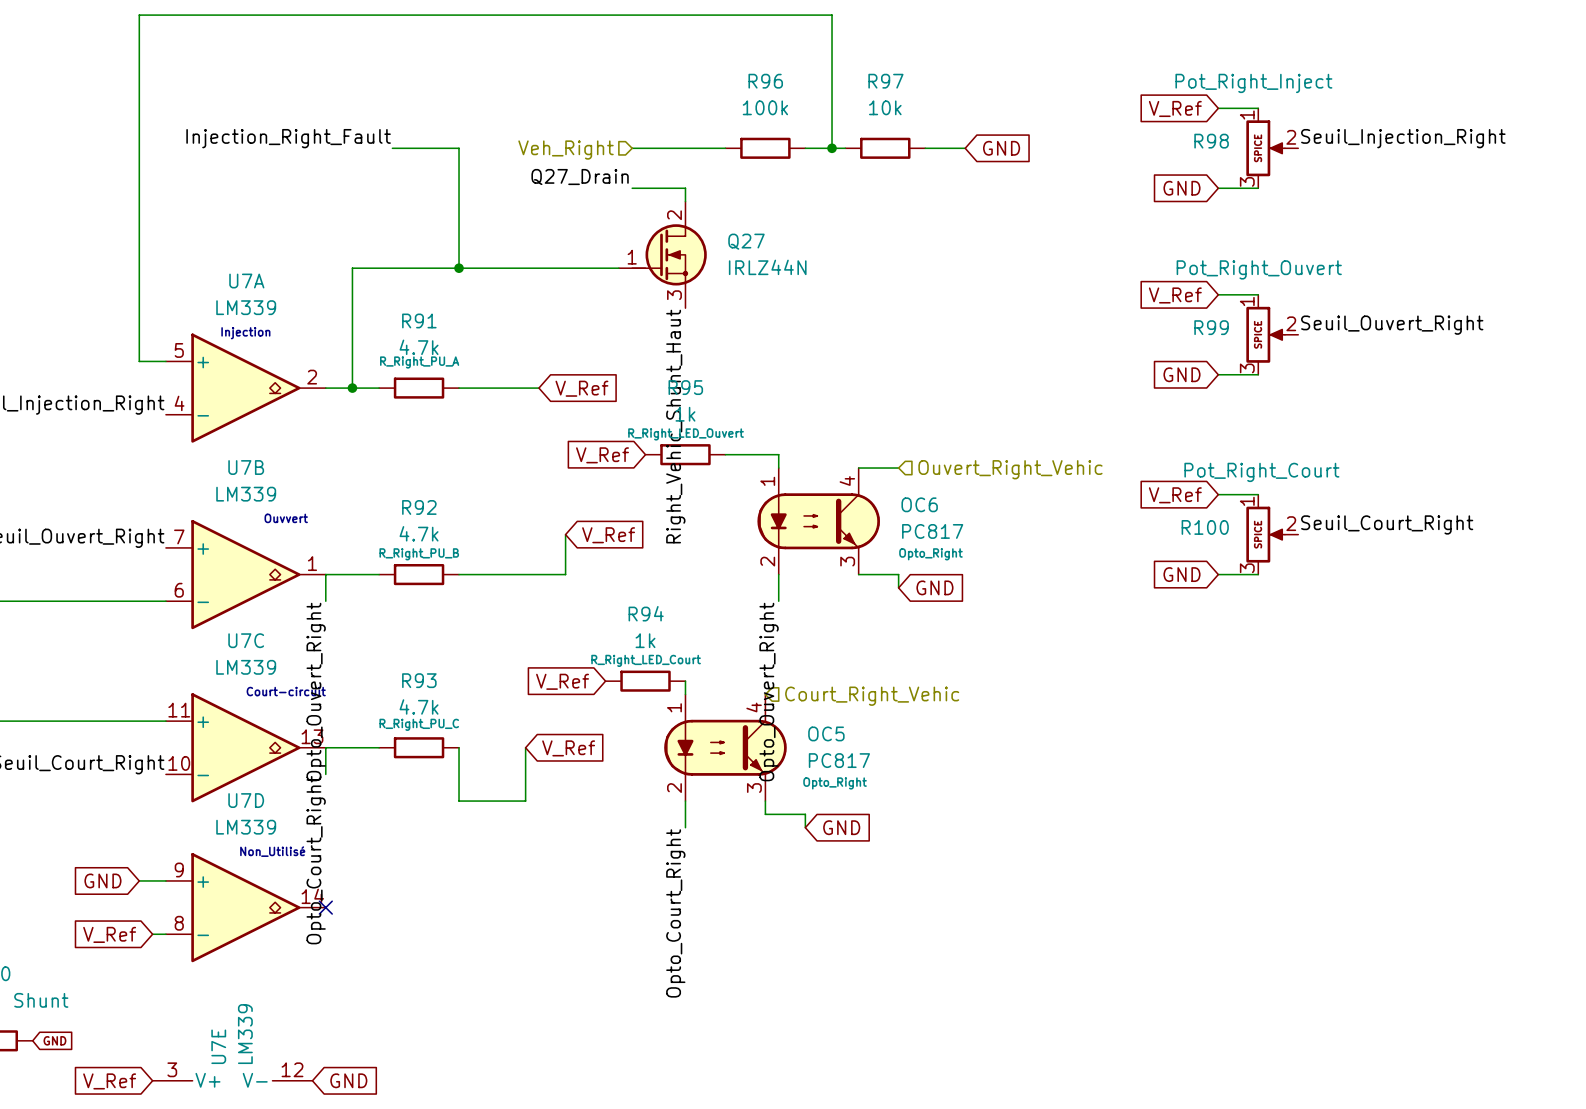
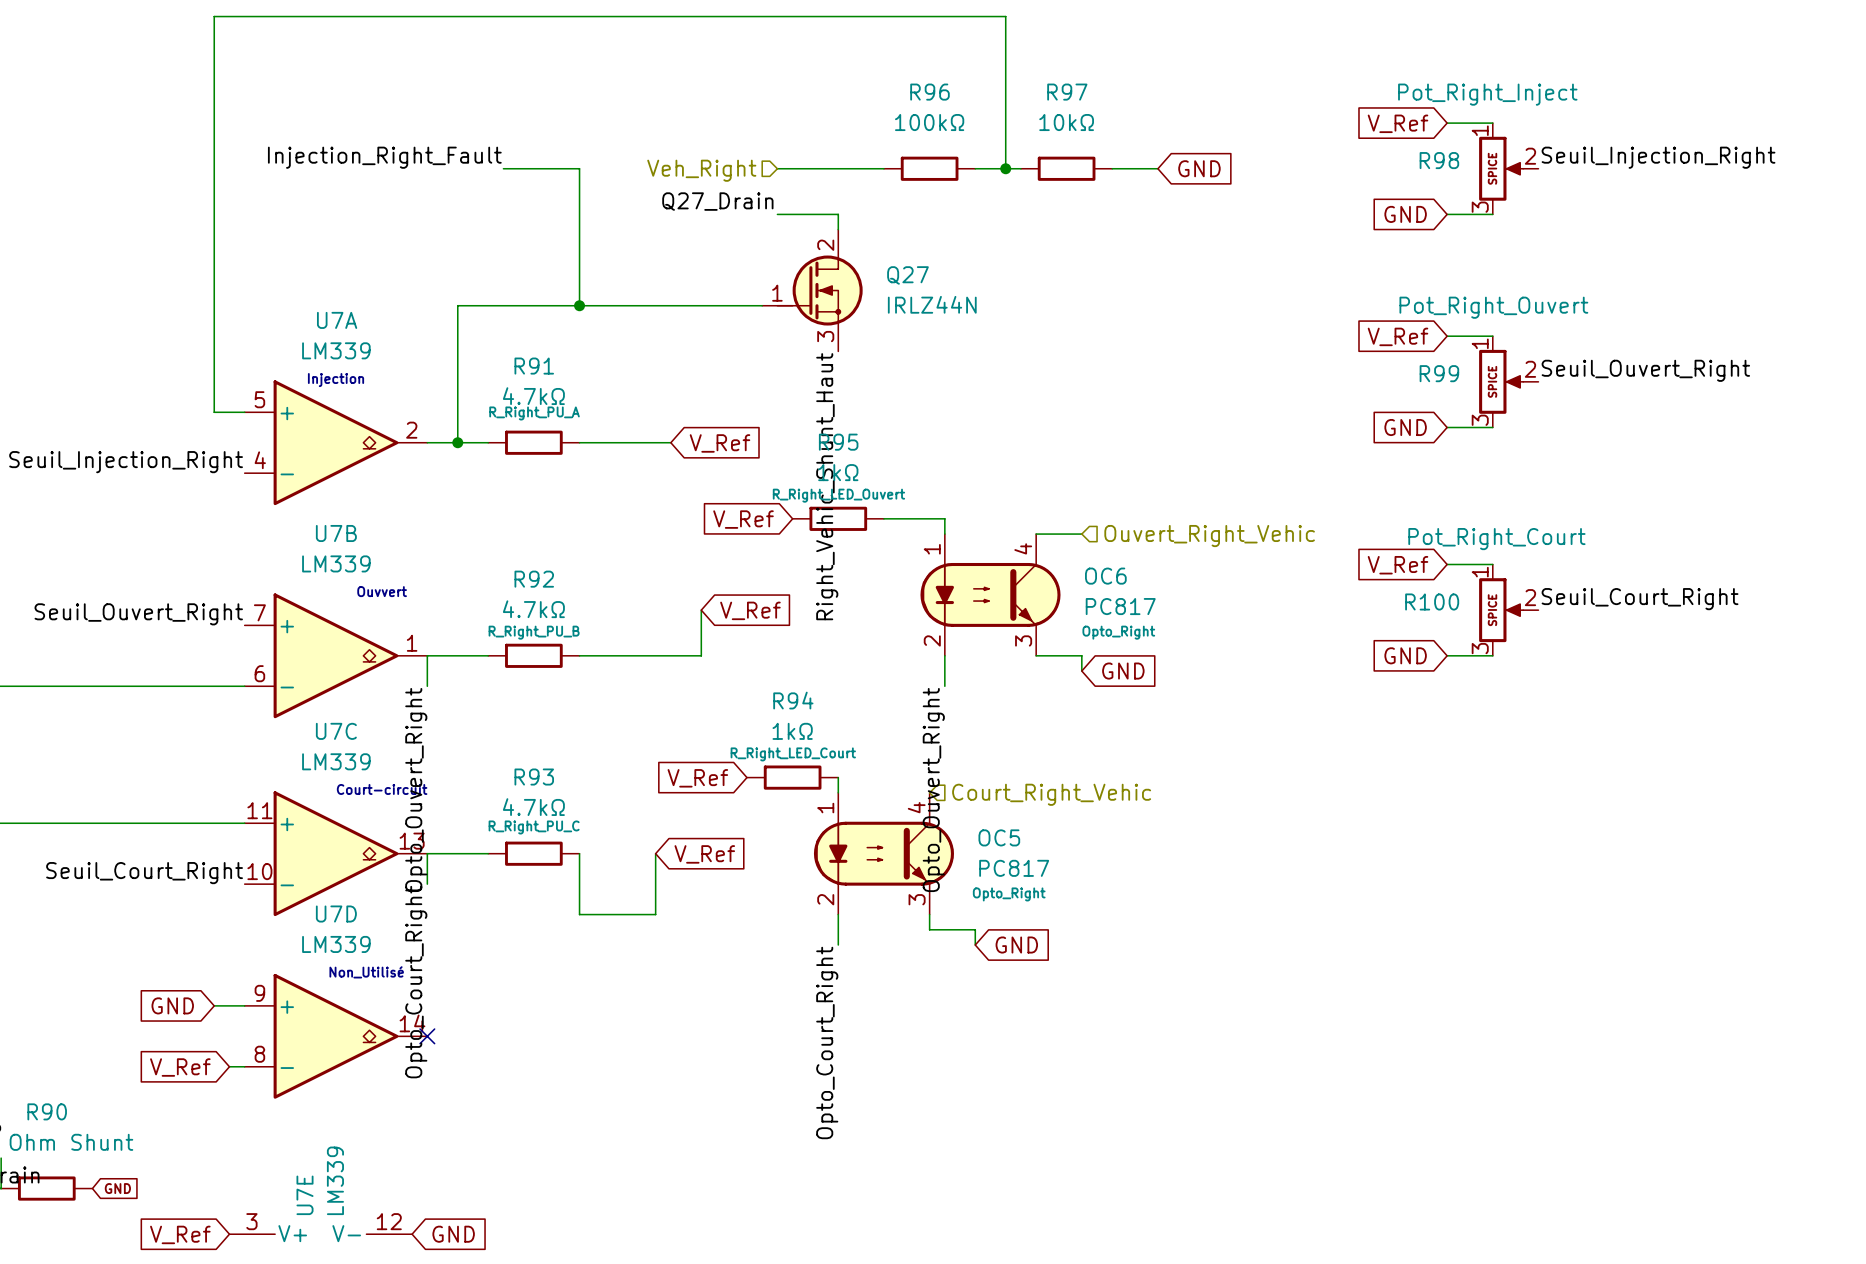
R96 value: 100k (765, 107) -> 100kΩ (929, 122)
R97 value: 10k (885, 107) -> 10kΩ (1066, 122)
R91 value: 4.7k (419, 347) -> 4.7kΩ (533, 396)
R95 value: 1k (685, 414) -> 1kΩ (838, 472)
R92 value: 4.7k (419, 533) -> 4.7kΩ (533, 609)
R94 value: 1k (645, 640) -> 1kΩ (792, 731)
R93 value: 4.7k (419, 706) -> 4.7kΩ (533, 807)

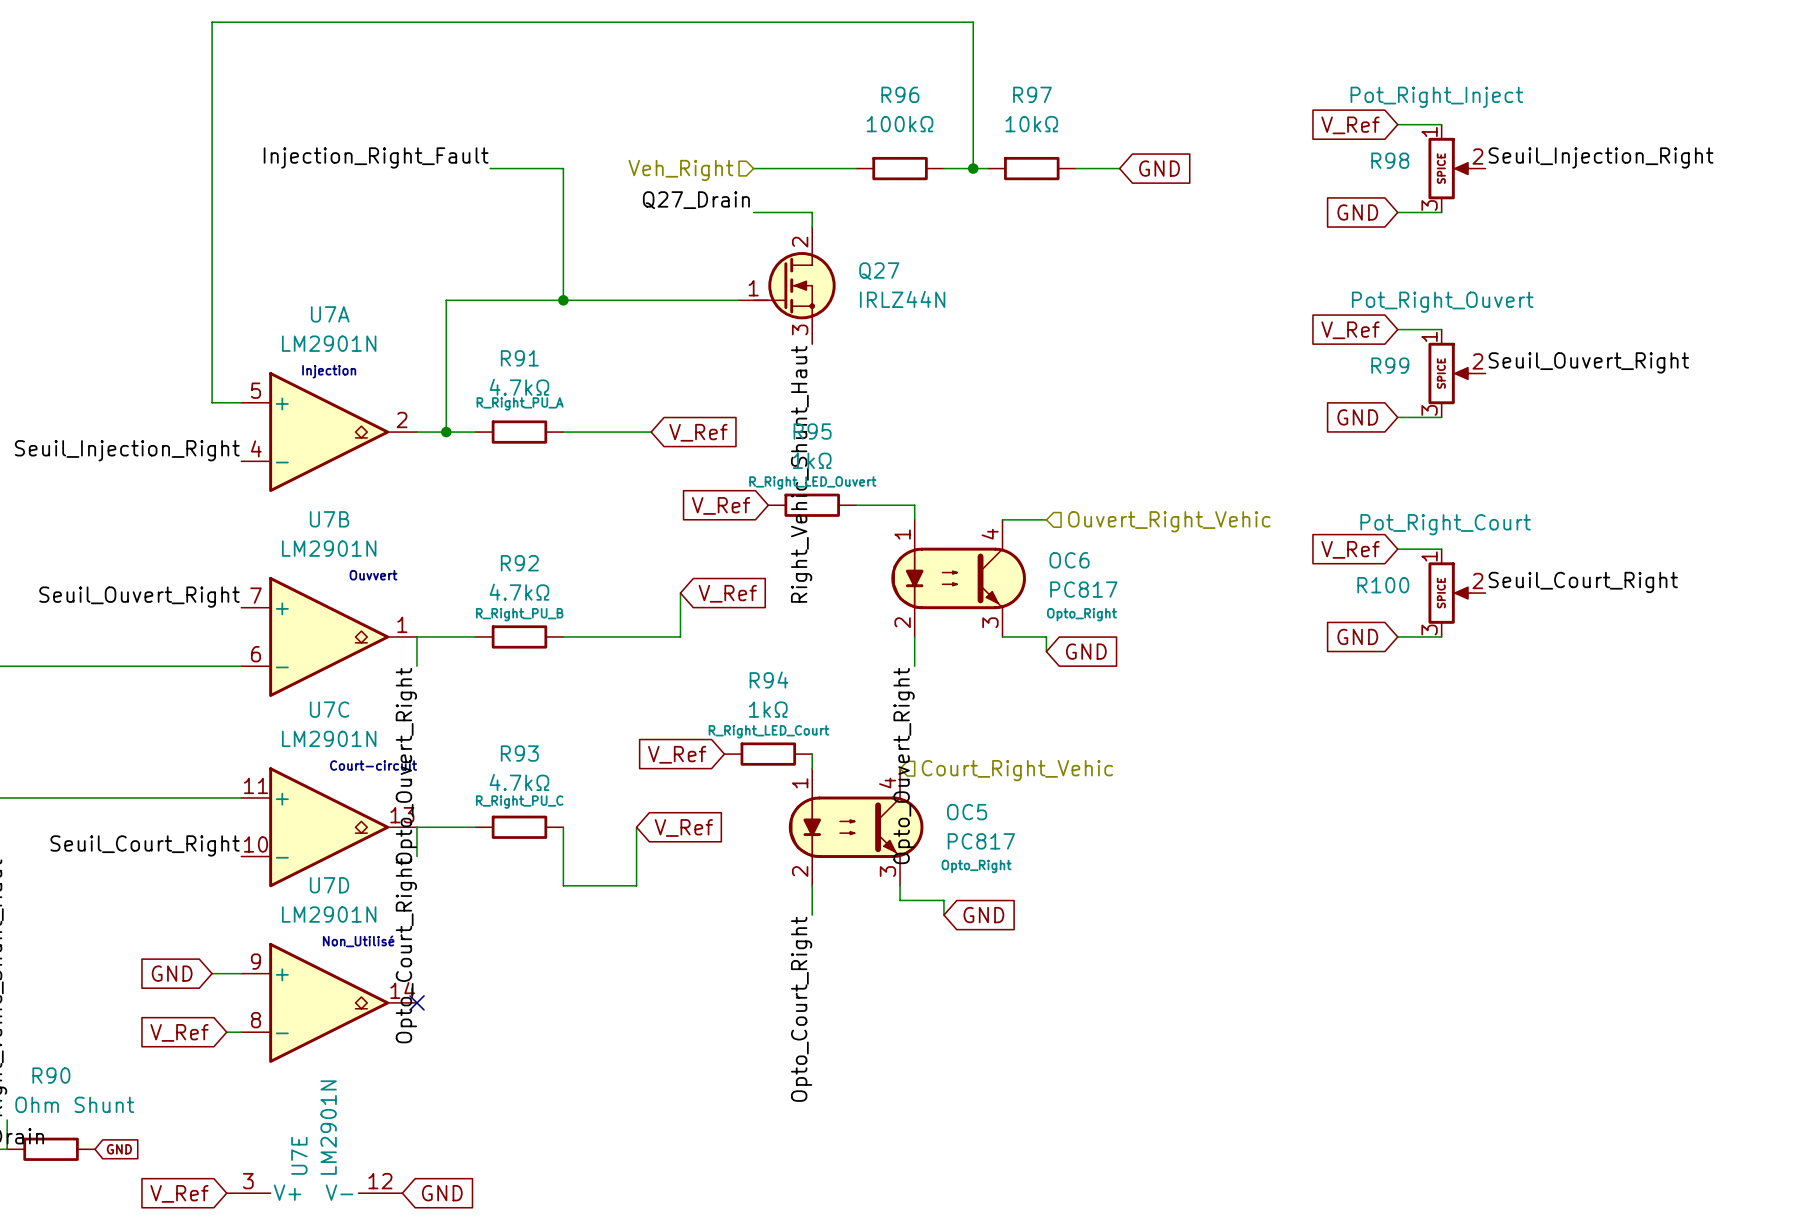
U7A value: LM339 (336, 350) -> LM2901N (329, 343)
U7B value: LM339 (336, 563) -> LM2901N (329, 548)
U7C value: LM339 (336, 761) -> LM2901N (329, 738)
U7D value: LM339 (336, 944) -> LM2901N (329, 914)
U7E value: LM339 (335, 1180) -> LM2901N (328, 1127)

